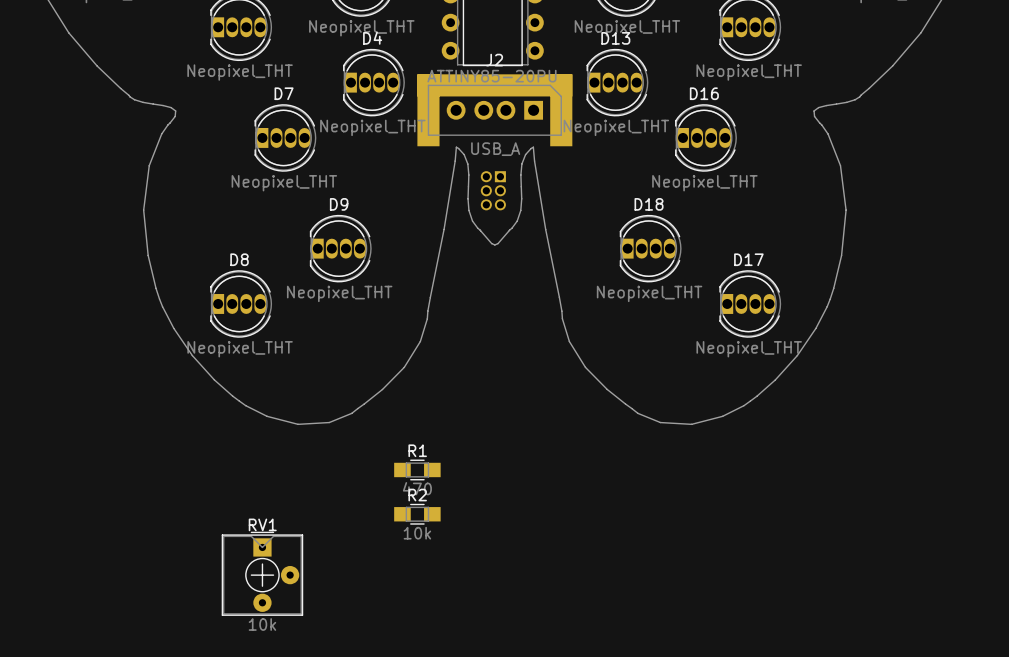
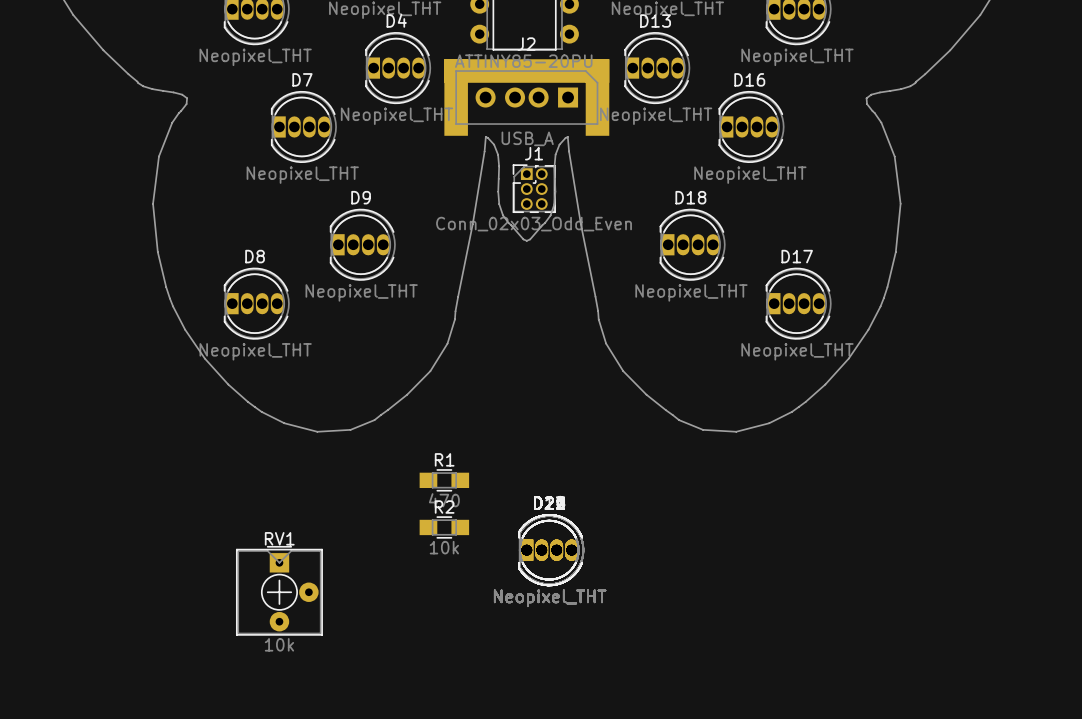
J1 side: bottom (493, 190) -> top (534, 188)
part: none -> Neopixel_THT (551, 550)
part: none -> Neopixel_THT (551, 550)
part: none -> Neopixel_THT (551, 550)
part: none -> Neopixel_THT (551, 550)
part: none -> Neopixel_THT (551, 550)
part: none -> Neopixel_THT (551, 550)

